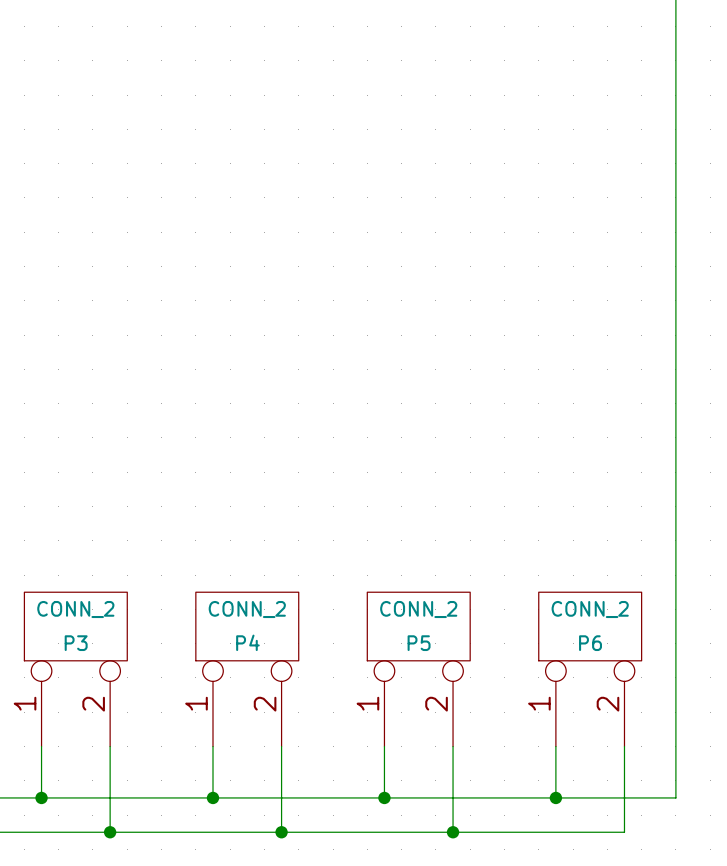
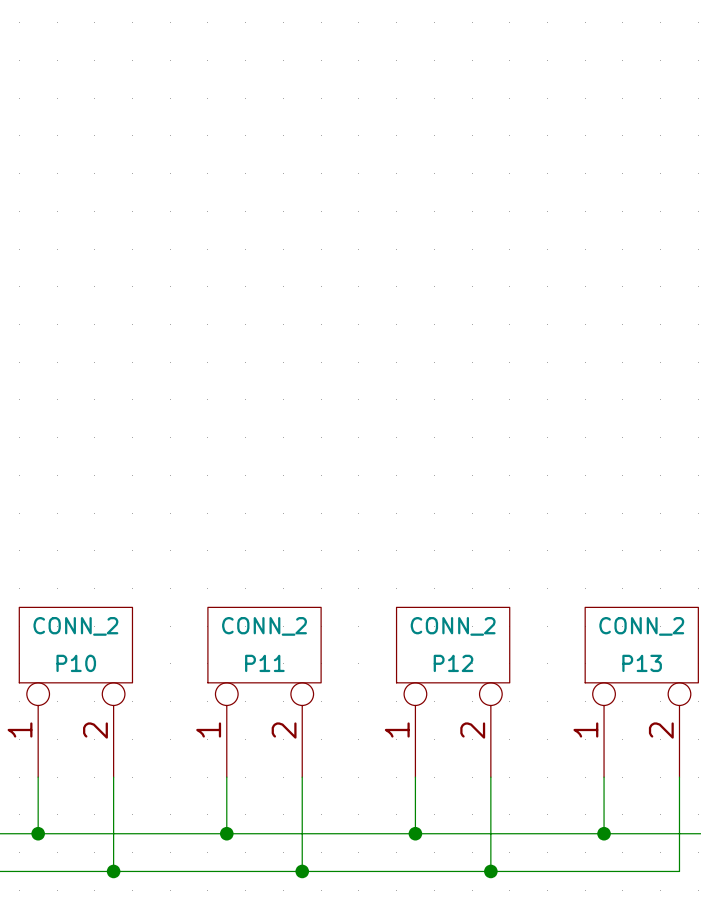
P4 name: P4 (247, 642) -> P11 (264, 663)
P3 name: P3 (76, 643) -> P10 (76, 663)
P5 name: P5 (419, 643) -> P12 (453, 663)
P6 name: P6 (590, 643) -> P13 (642, 663)

